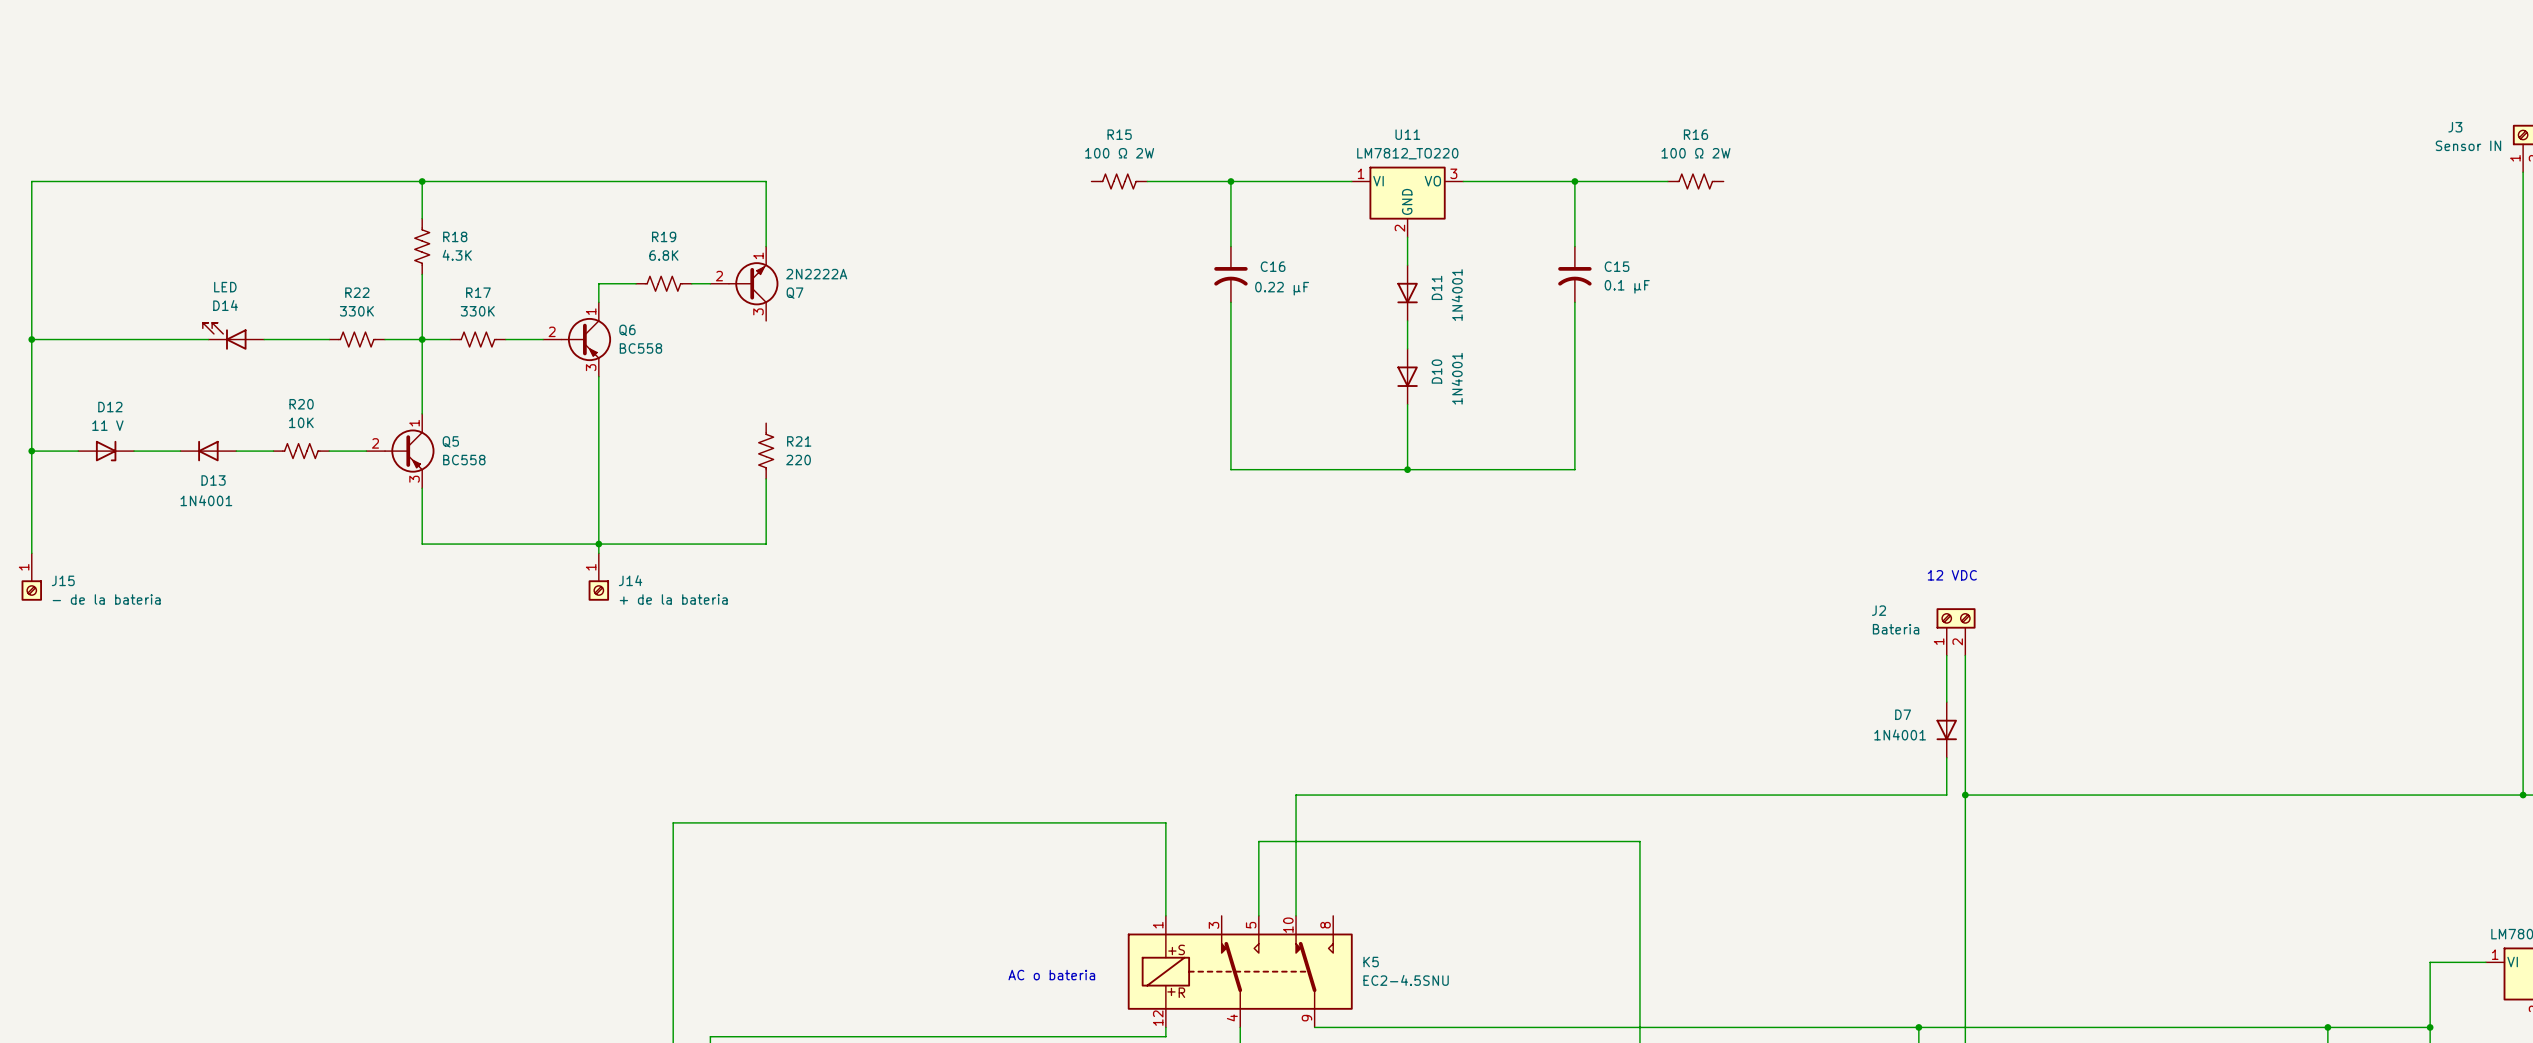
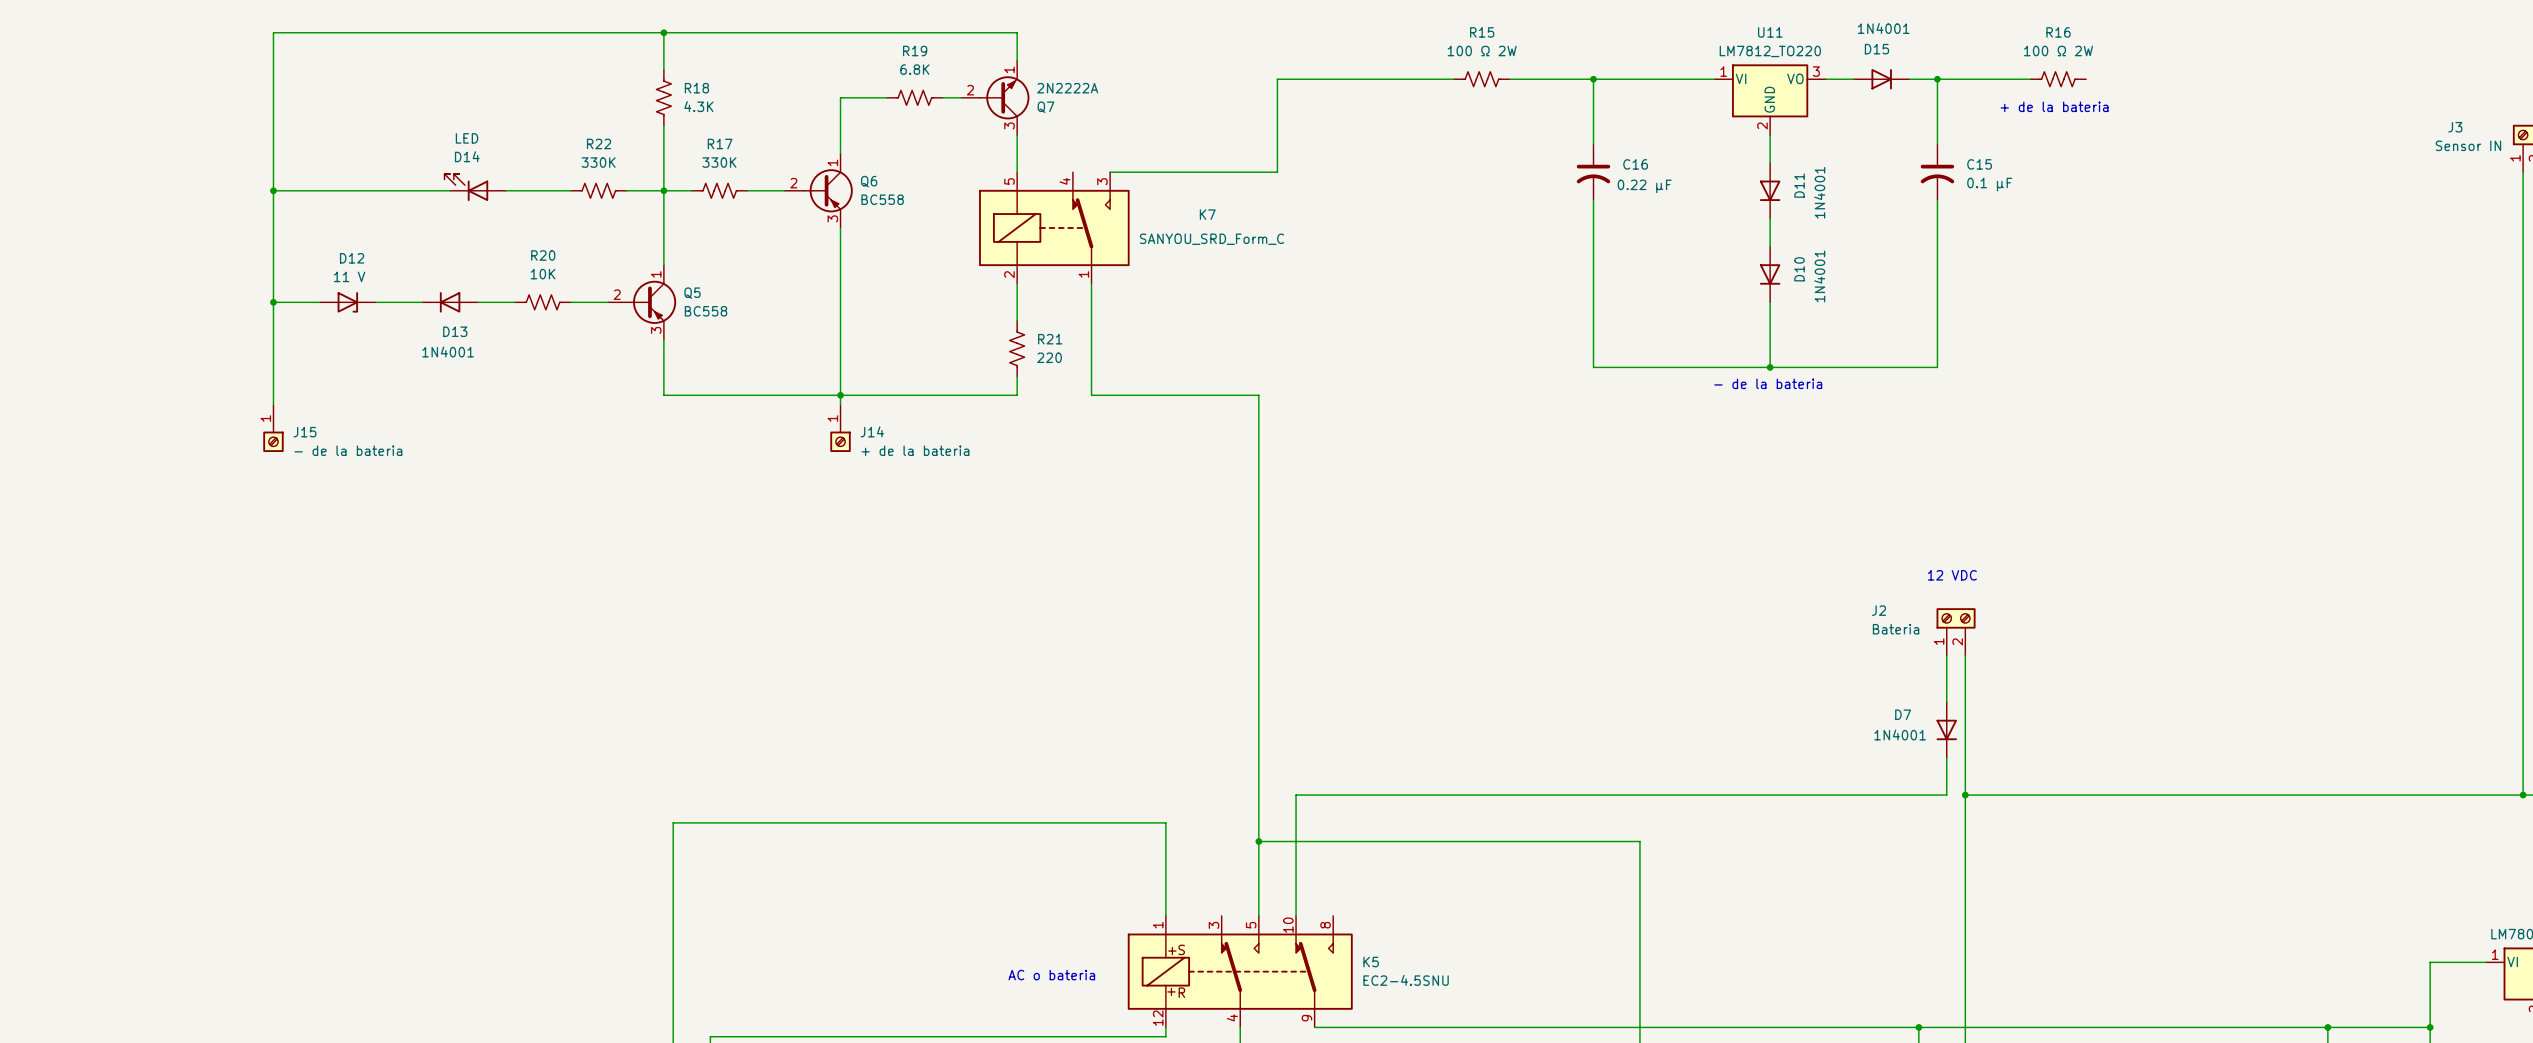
wire: none -> (663, 32) (663, 69)
junction: none -> (663, 32)
wire: none -> (1017, 60) (1017, 32) (273, 32) (273, 404)
wire: none -> (1454, 79) (1277, 79) (1277, 172) (1110, 172)
junction: none -> (1593, 79)
wire: none -> (1825, 79) (1853, 79)
D15: none -> 1N4001 (1881, 79)
wire: none -> (1909, 79) (2030, 79)
wire: none -> (1937, 79) (1937, 144)
junction: none -> (1937, 79)
wire: none -> (887, 97) (840, 97) (840, 153)
wire: none -> (942, 97) (961, 97)
text: none -> + de la bateria (2054, 106)
wire: none -> (663, 125) (663, 265)
wire: none -> (1017, 135) (1017, 172)
wire: none -> (1770, 135) (1770, 162)
wire: (422, 181) (422, 218) -> none
junction: (422, 181) -> none
R15 position: (1119, 181) -> (1481, 79)
wire: (1147, 181) (1351, 181) -> none
wire: (1230, 181) (1230, 246) -> none
junction: (1230, 181) -> none
wire: (1463, 181) (1667, 181) -> (1509, 79) (1714, 79)
wire: (1574, 181) (1574, 246) -> (1593, 79) (1593, 144)
junction: (1574, 181) -> none
R16 position: (1695, 181) -> (2058, 79)
wire: none -> (273, 190) (450, 190)
junction: none -> (273, 190)
wire: none -> (505, 190) (570, 190)
wire: none -> (626, 190) (691, 190)
junction: none -> (663, 190)
wire: none -> (747, 190) (784, 190)
wire: none -> (1593, 200) (1593, 367) (1937, 367) (1937, 200)
U11 position: (1407, 201) -> (1770, 99)
wire: none -> (1770, 218) (1770, 246)
wire: none -> (840, 227) (840, 404)
K7: none -> SANYOU_SRD_Form_C (1054, 227)
wire: (1407, 237) (1407, 265) -> none
R18 position: (422, 246) -> (663, 97)
wire: (766, 246) (766, 181) (31, 181) (31, 553) -> none
wire: (422, 274) (422, 413) -> none
C16 position: (1230, 274) -> (1593, 172)
C15 position: (1574, 274) -> (1937, 172)
wire: (636, 283) (598, 283) (598, 302) -> none
R19 position: (663, 283) -> (914, 97)
wire: (691, 283) (710, 283) -> none
Q7 position: (744, 283) -> (995, 97)
wire: none -> (1017, 283) (1017, 320)
wire: none -> (1091, 283) (1091, 395) (1258, 395) (1258, 841)
D11 position: (1407, 293) -> (1770, 190)
wire: none -> (273, 302) (319, 302)
junction: none -> (273, 302)
wire: none -> (375, 302) (422, 302)
wire: none -> (570, 302) (608, 302)
wire: (1230, 302) (1230, 469) (1574, 469) (1574, 302) -> none
wire: none -> (1770, 302) (1770, 367)
wire: (1407, 320) (1407, 348) -> none
D14 position: (233, 336) -> (475, 187)
wire: (31, 339) (208, 339) -> none
junction: (31, 339) -> none
wire: (264, 339) (329, 339) -> none
R22 position: (357, 339) -> (598, 190)
wire: (385, 339) (450, 339) -> none
junction: (422, 339) -> none
R17 position: (477, 339) -> (719, 190)
wire: (505, 339) (543, 339) -> (477, 302) (515, 302)
Q6 position: (577, 339) -> (818, 190)
wire: none -> (663, 339) (663, 395) (1017, 395) (1017, 376)
junction: none -> (1770, 367)
wire: (598, 376) (598, 553) -> none
D10 position: (1407, 376) -> (1770, 274)
text: none -> - de la bateria (1768, 383)
junction: none -> (840, 395)
wire: (1407, 404) (1407, 469) -> none
wire: (31, 451) (78, 451) -> none
junction: (31, 451) -> none
D12 position: (106, 451) -> (347, 302)
wire: (134, 451) (180, 451) -> none
D13 position: (208, 451) -> (450, 302)
wire: (236, 451) (273, 451) -> none
R20 position: (301, 451) -> (543, 302)
wire: (329, 451) (366, 451) -> none
Q5 position: (400, 451) -> (642, 302)
R21 position: (766, 451) -> (1017, 348)
junction: (1407, 469) -> none
wire: (766, 478) (766, 544) (422, 544) (422, 488) -> none
junction: (598, 544) -> none
J15 position: (31, 577) -> (273, 428)
J14 position: (598, 577) -> (840, 428)
junction: none -> (1258, 841)

